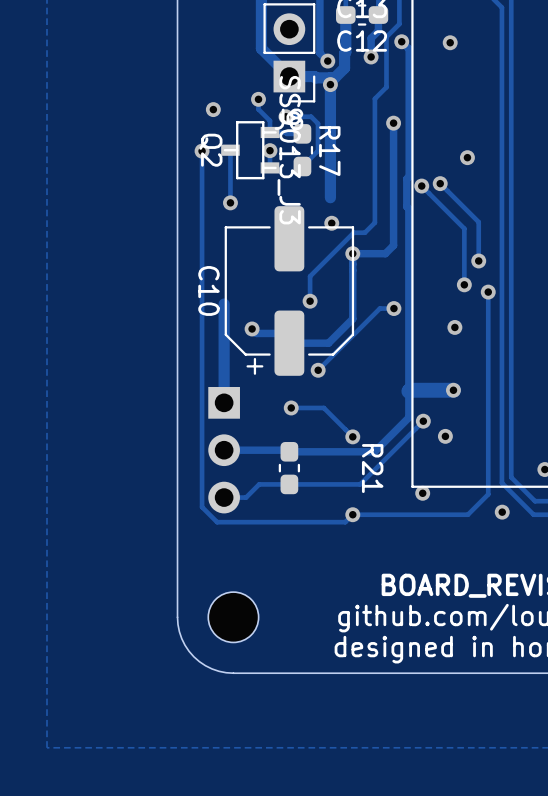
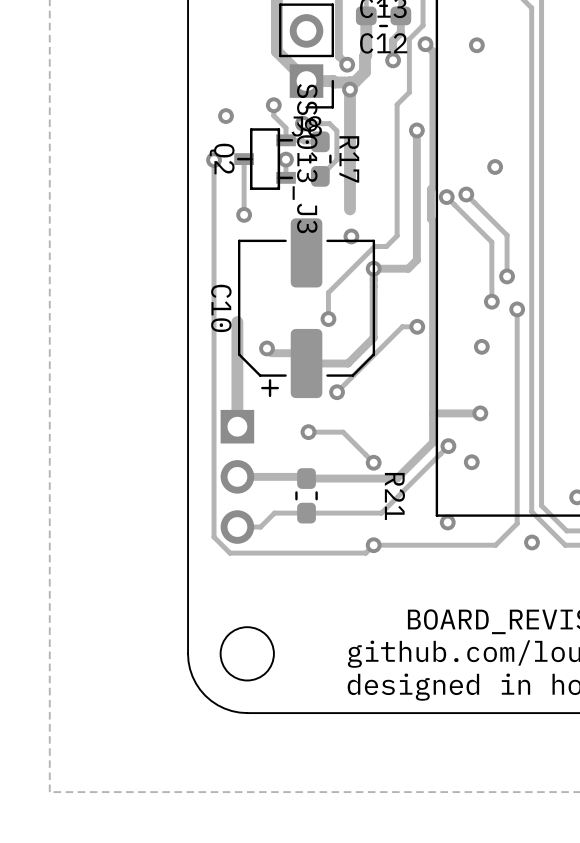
track width: thick (453, 390) (408, 391) -> thin (480, 413) (433, 414)

